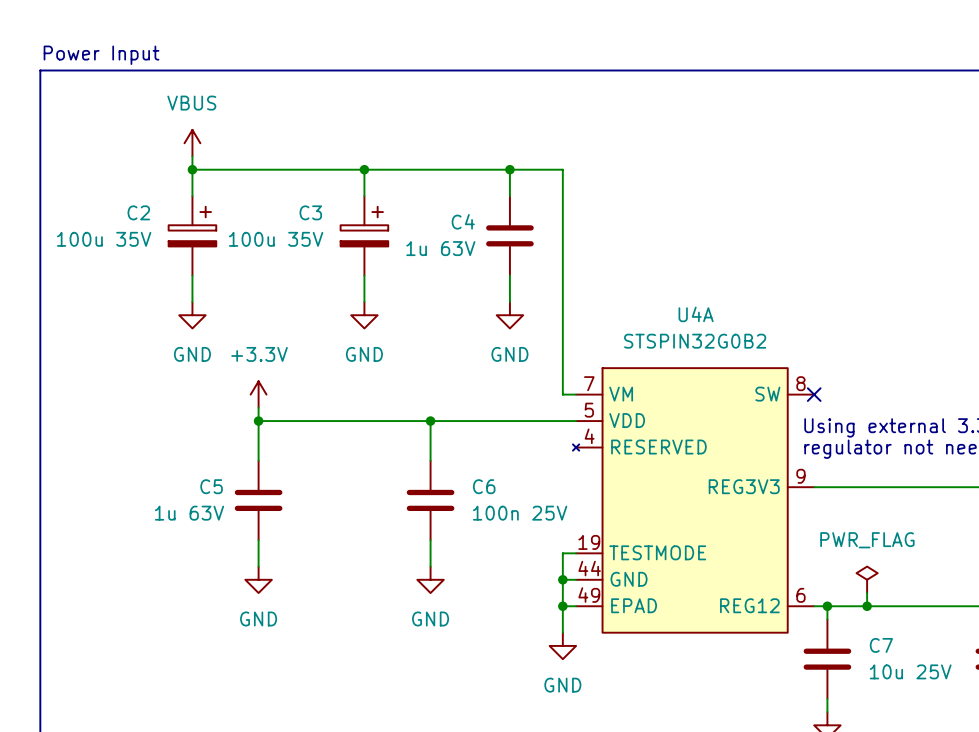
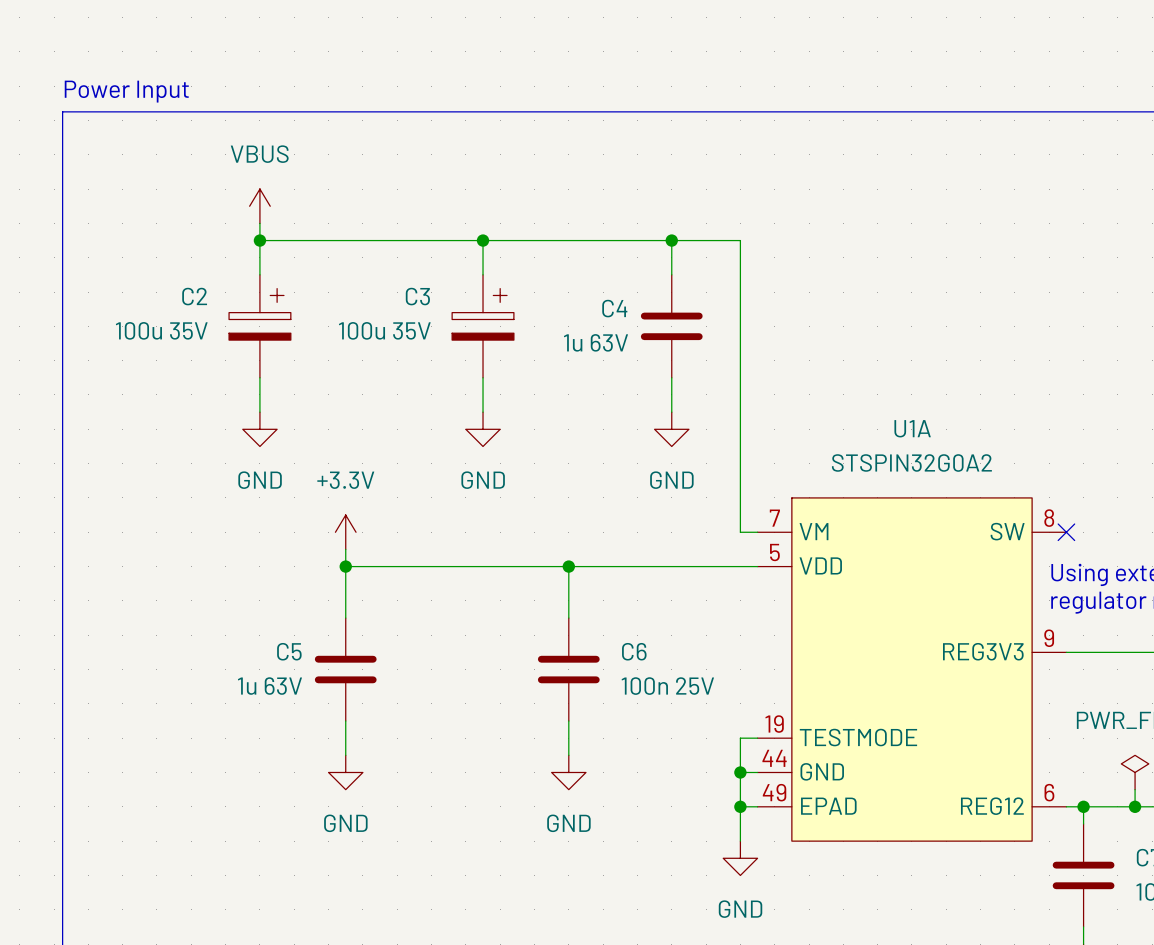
U4A: STSPIN32G0B2 (693, 500) -> none
U1A: none -> STSPIN32G0A2 (911, 669)

